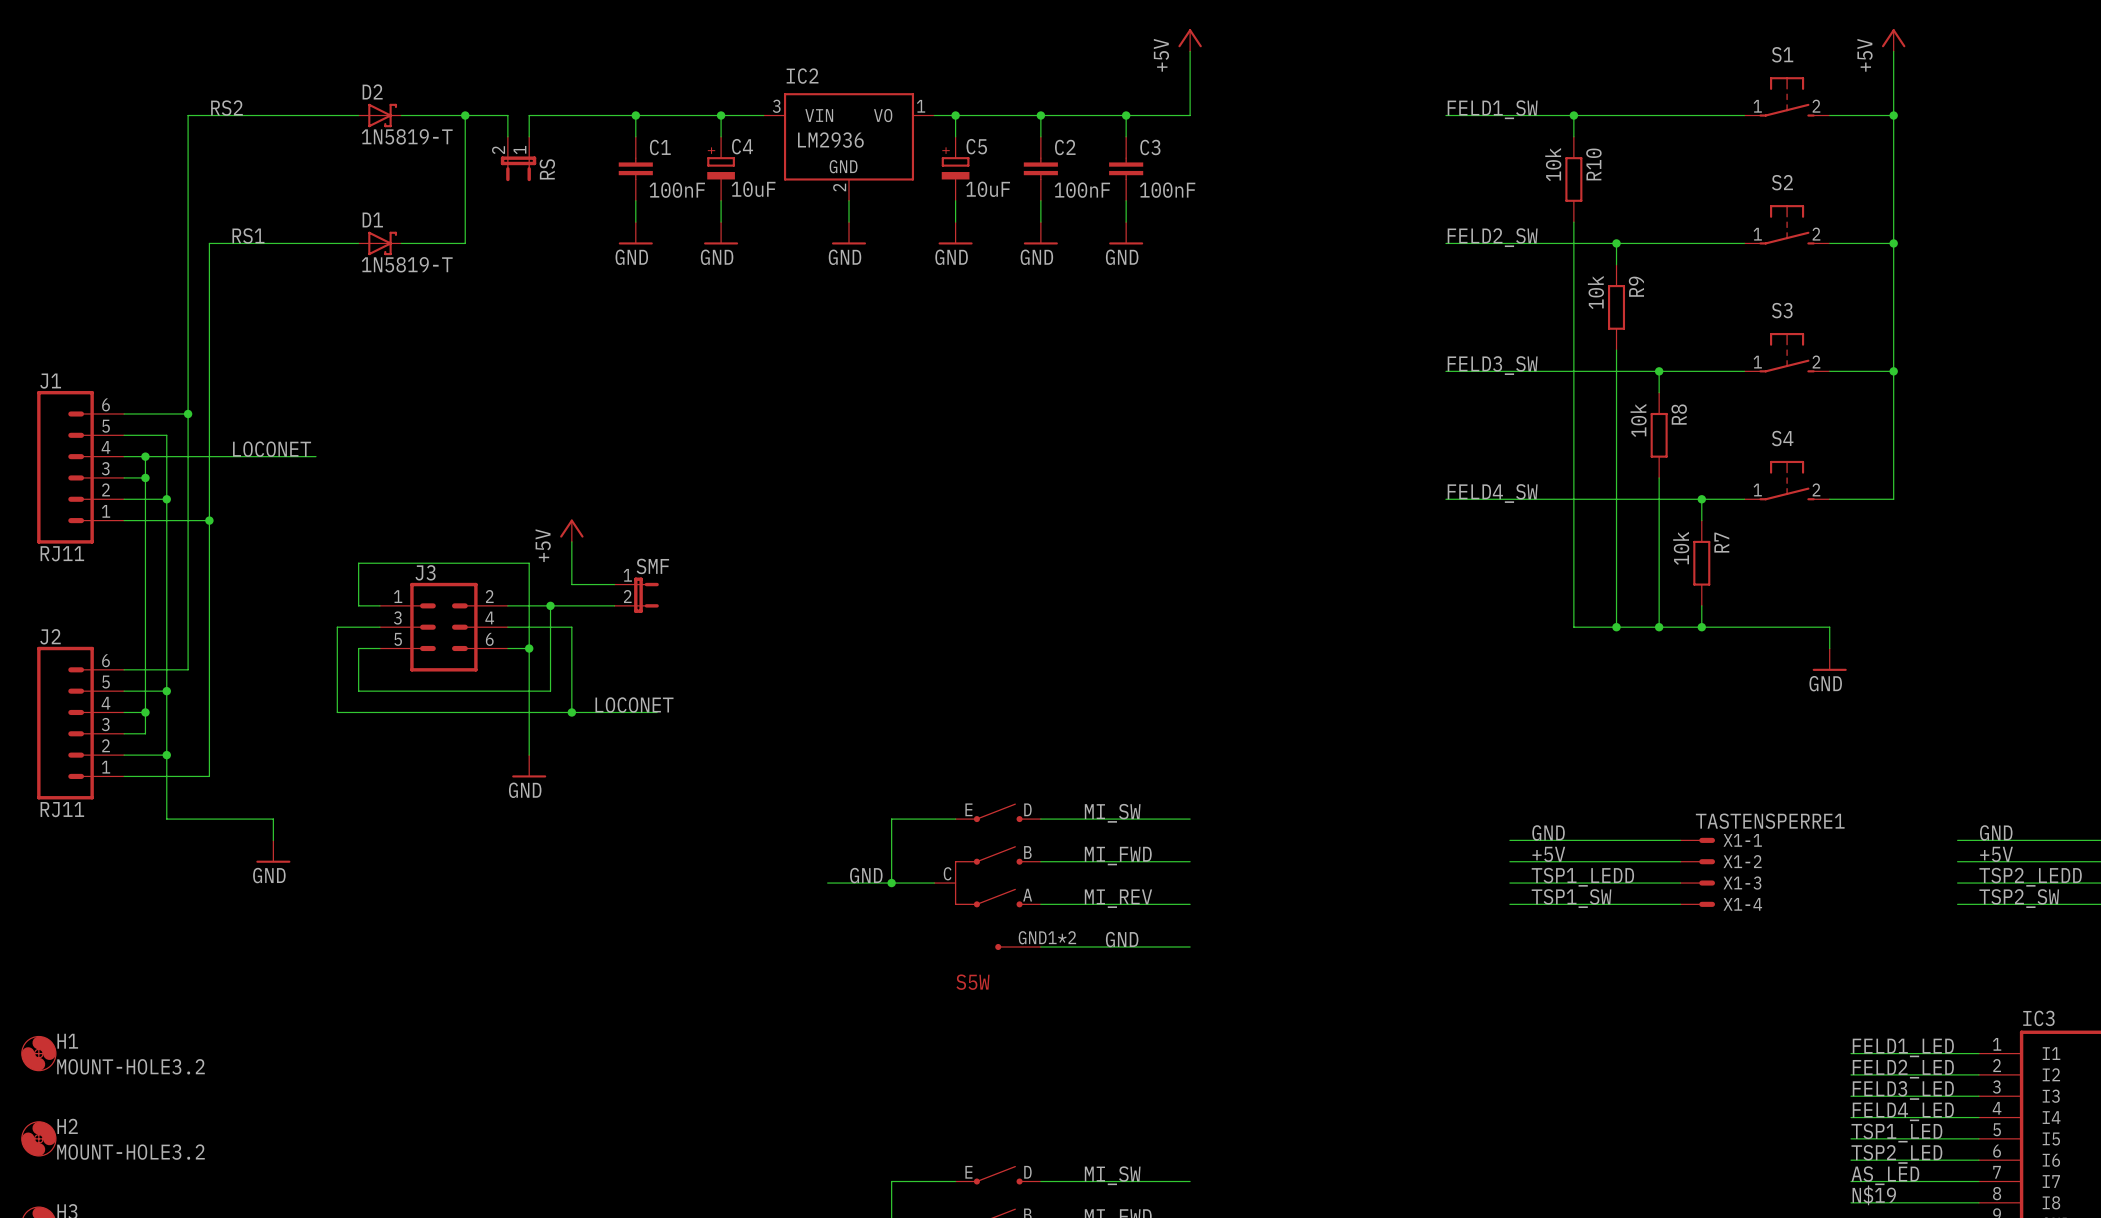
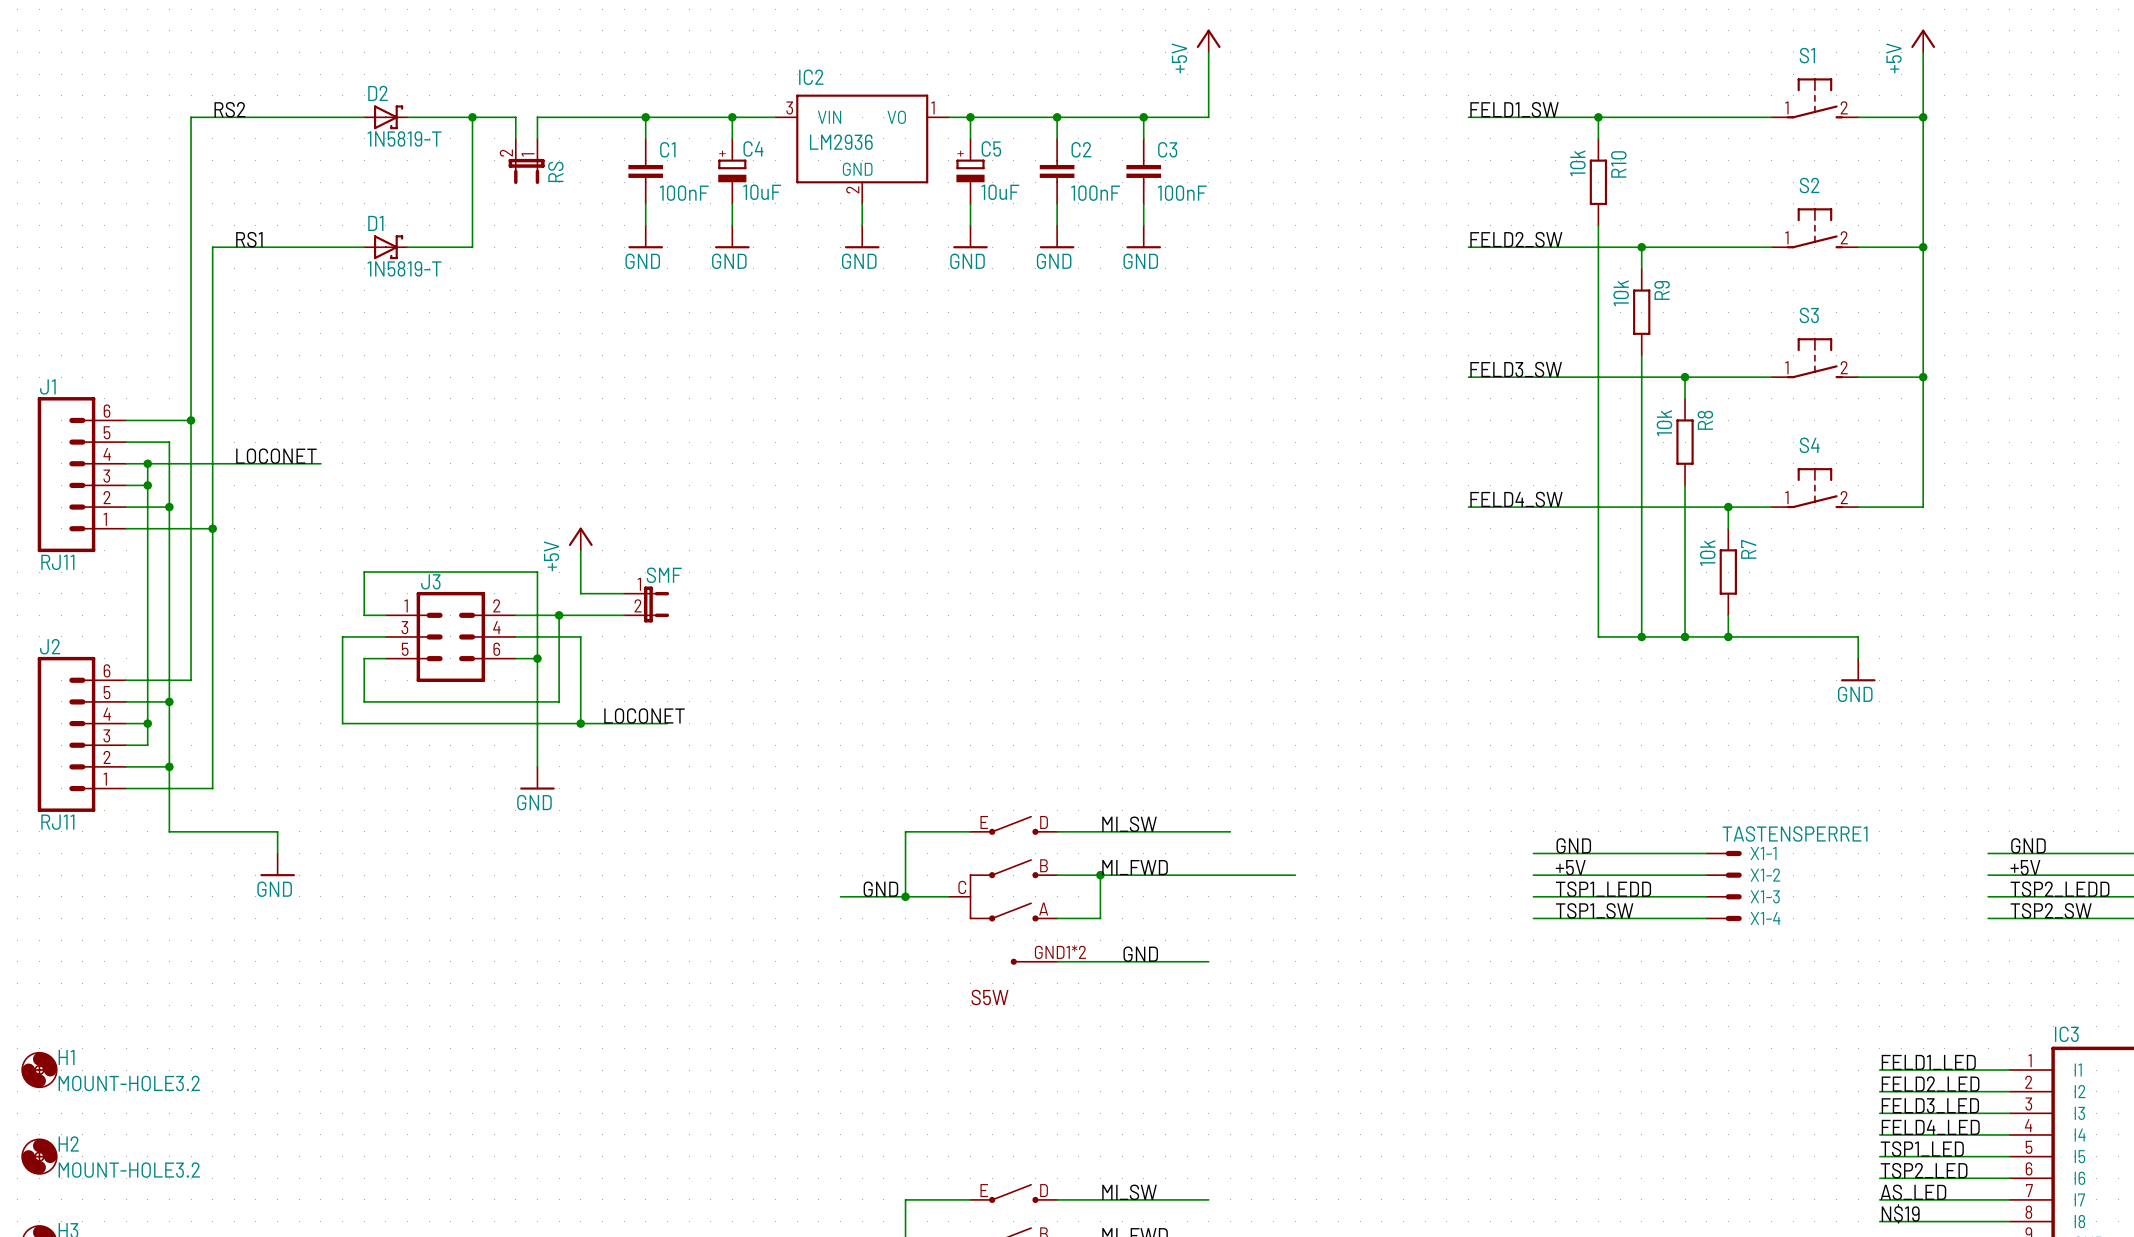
wire: none -> (1208, 831) (1230, 831)
junction: none -> (1100, 875)
wire: none -> (1208, 875) (1295, 875)
label: MI_REV (1118, 898) -> none
wire: (1083, 904) (1190, 904) -> (1100, 918) (1100, 875)

